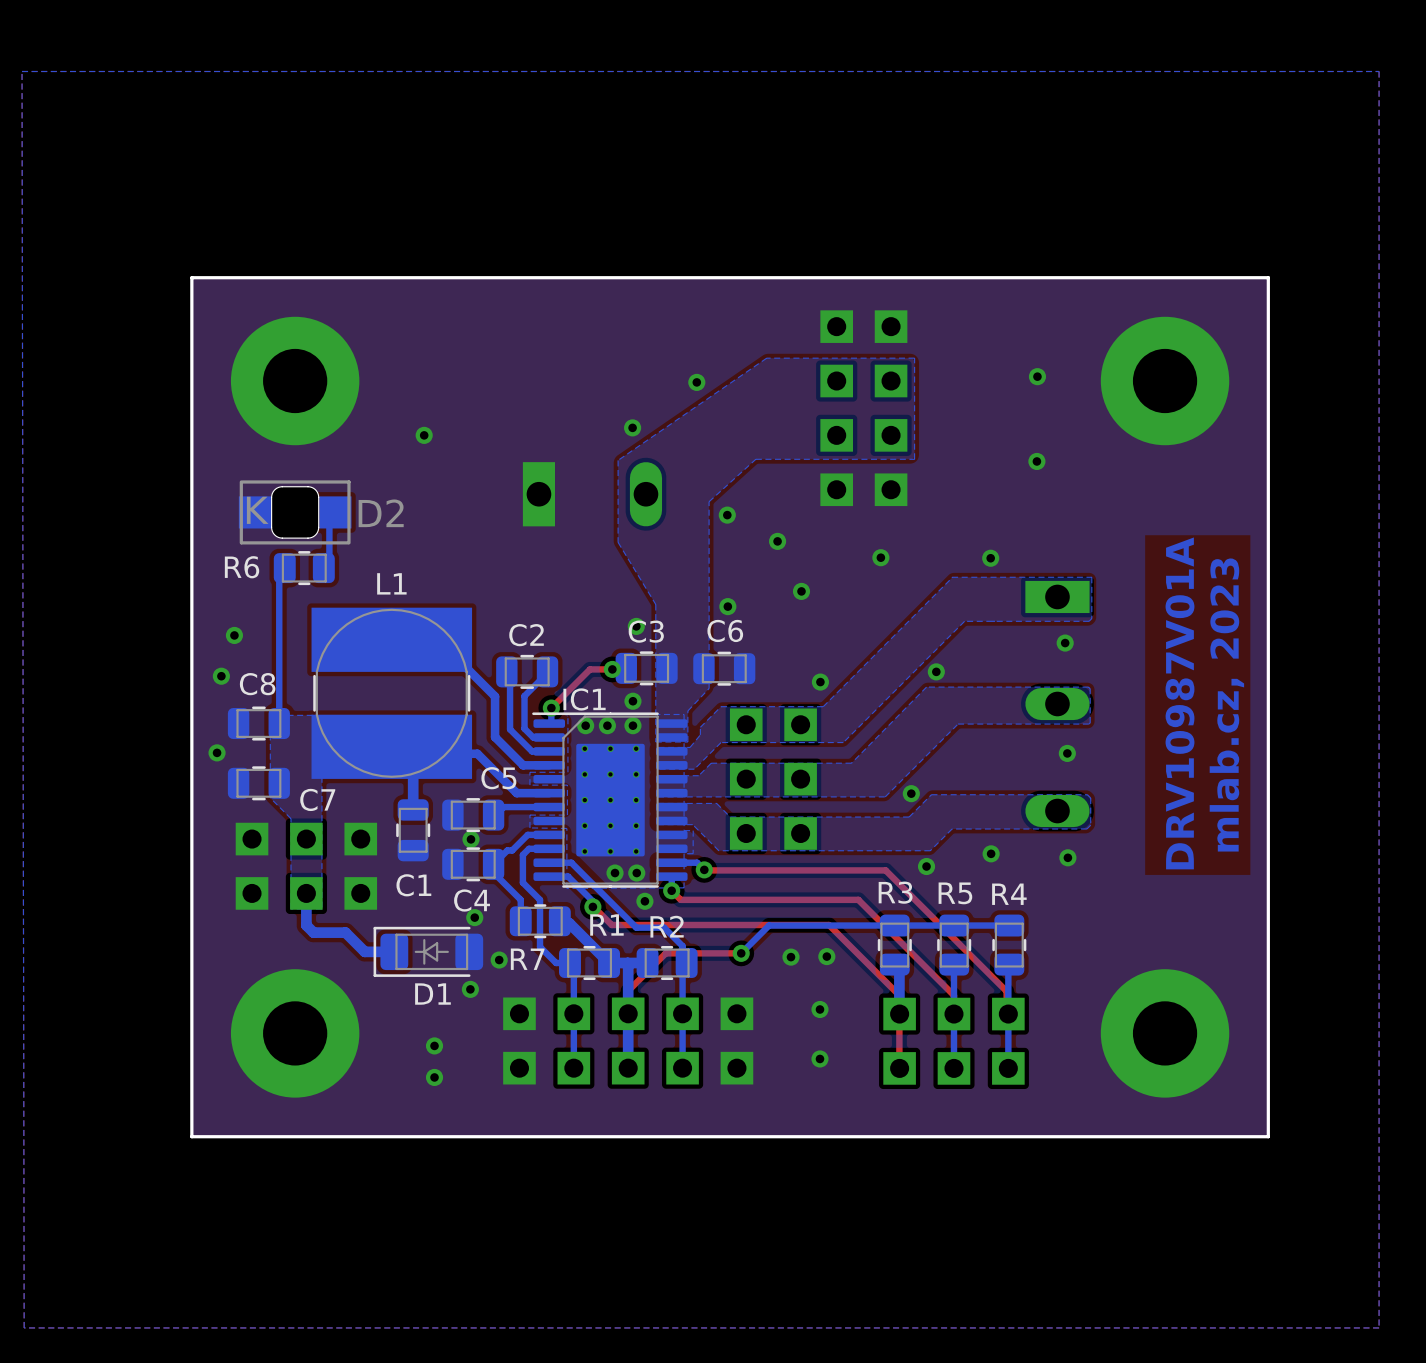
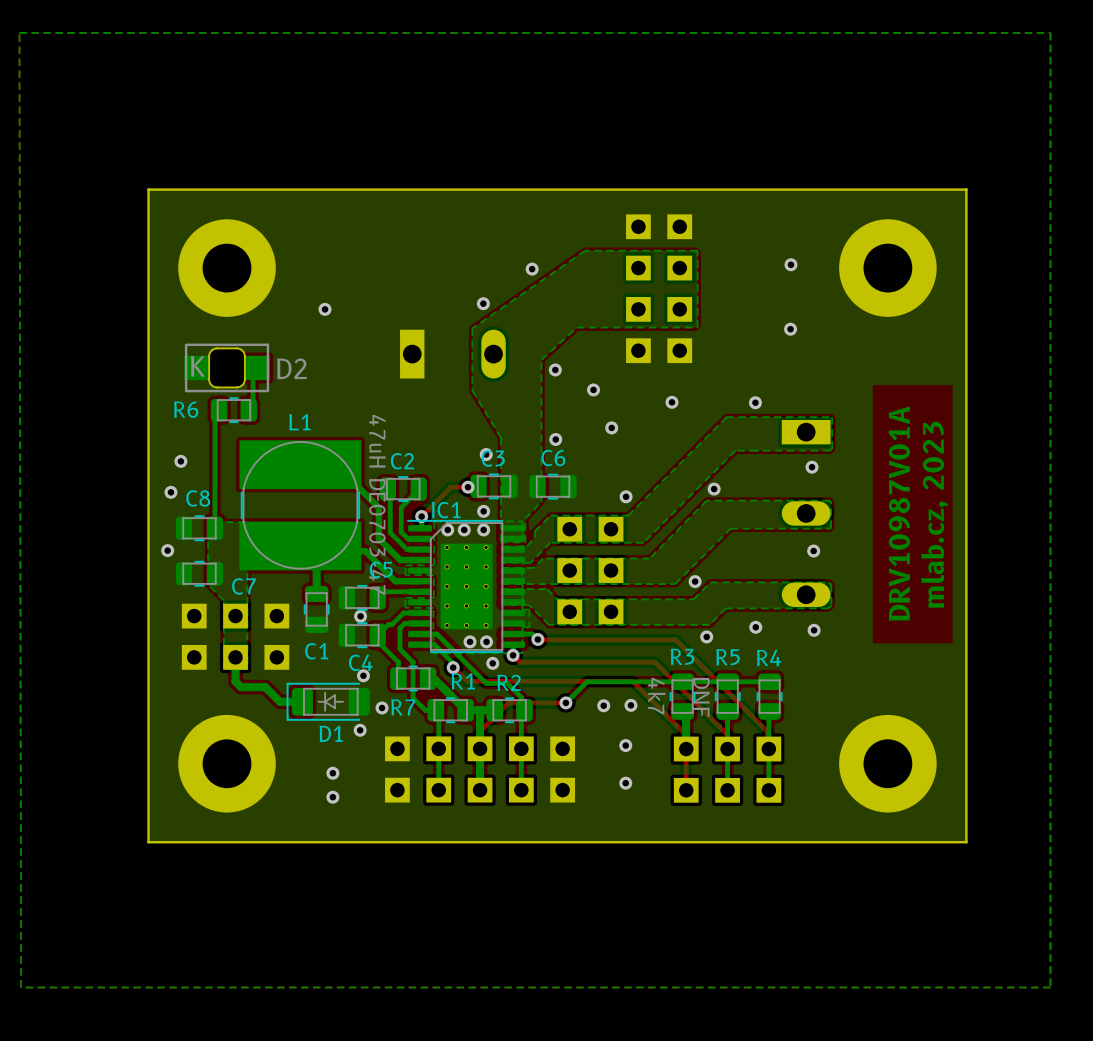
L1 value: none -> 47uH DE0703-47 (377, 504)
R3 value: none -> 4k7 (656, 696)
R5 value: none -> DNF (701, 697)

